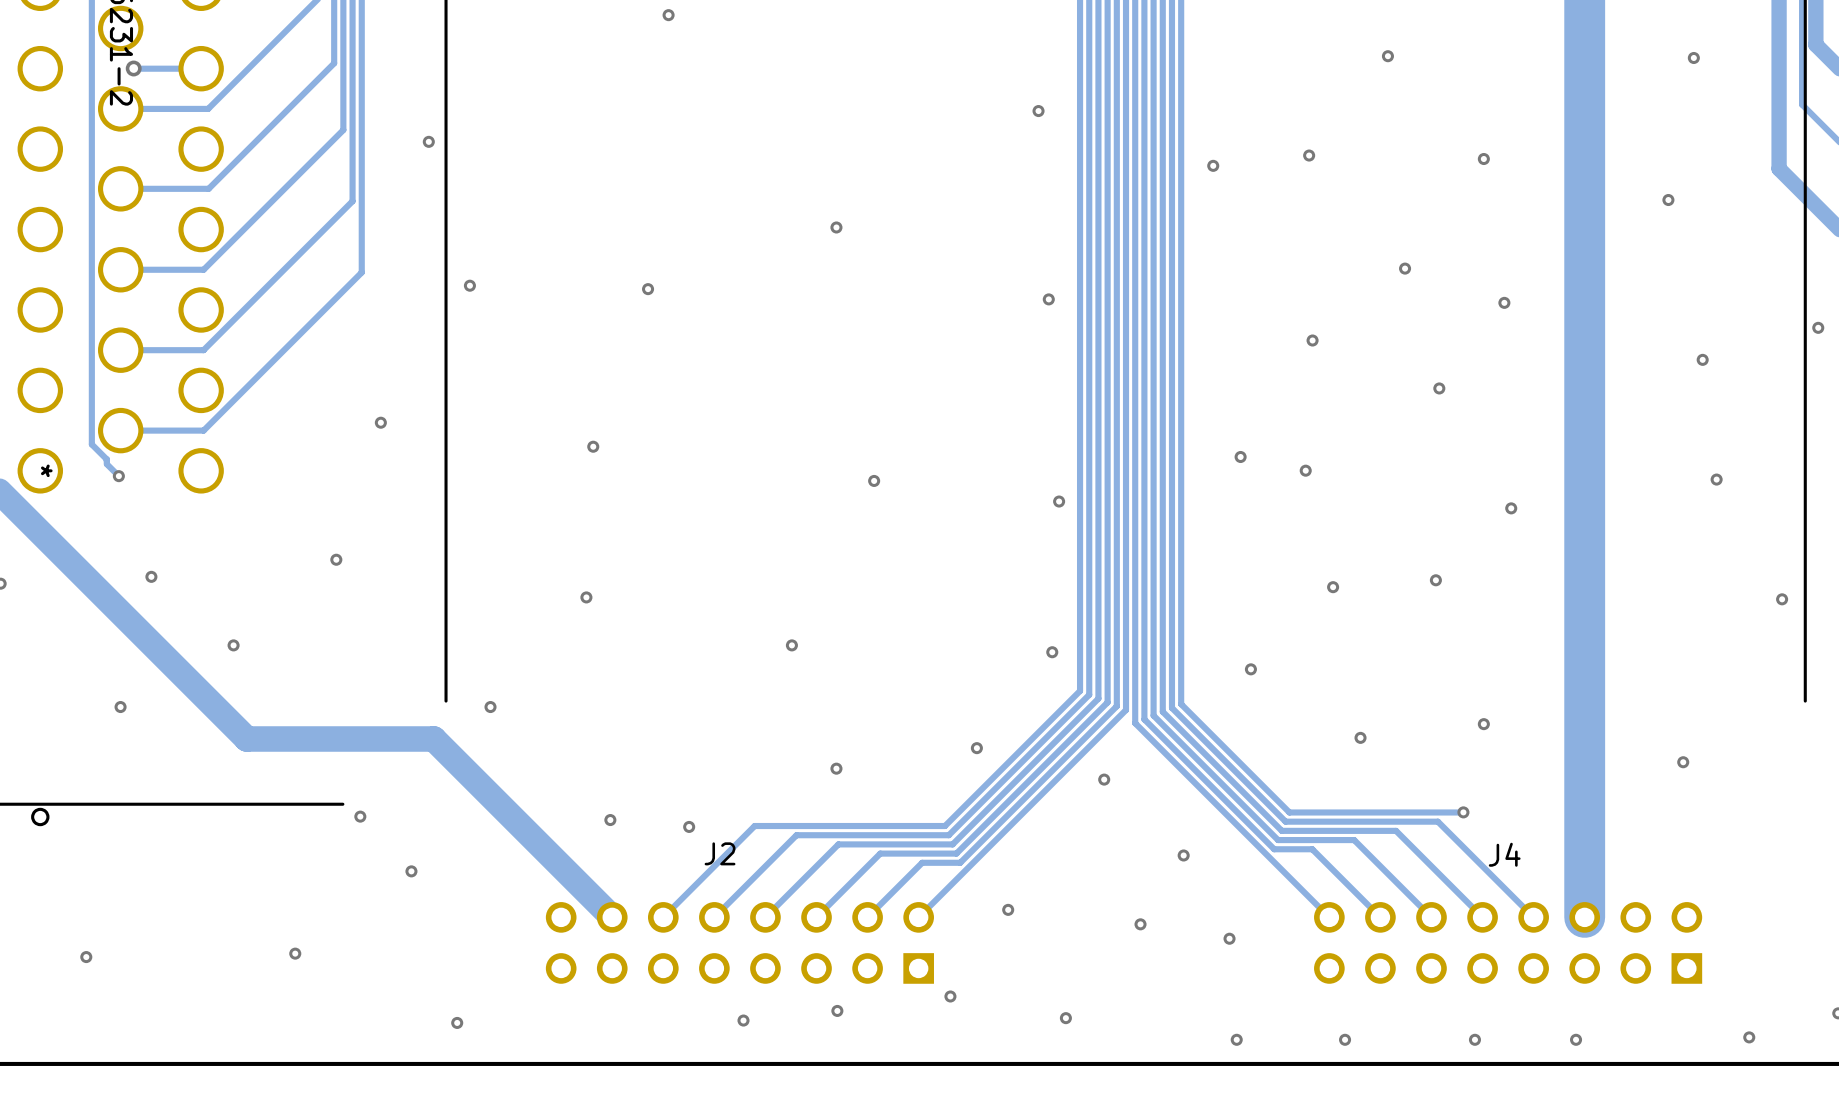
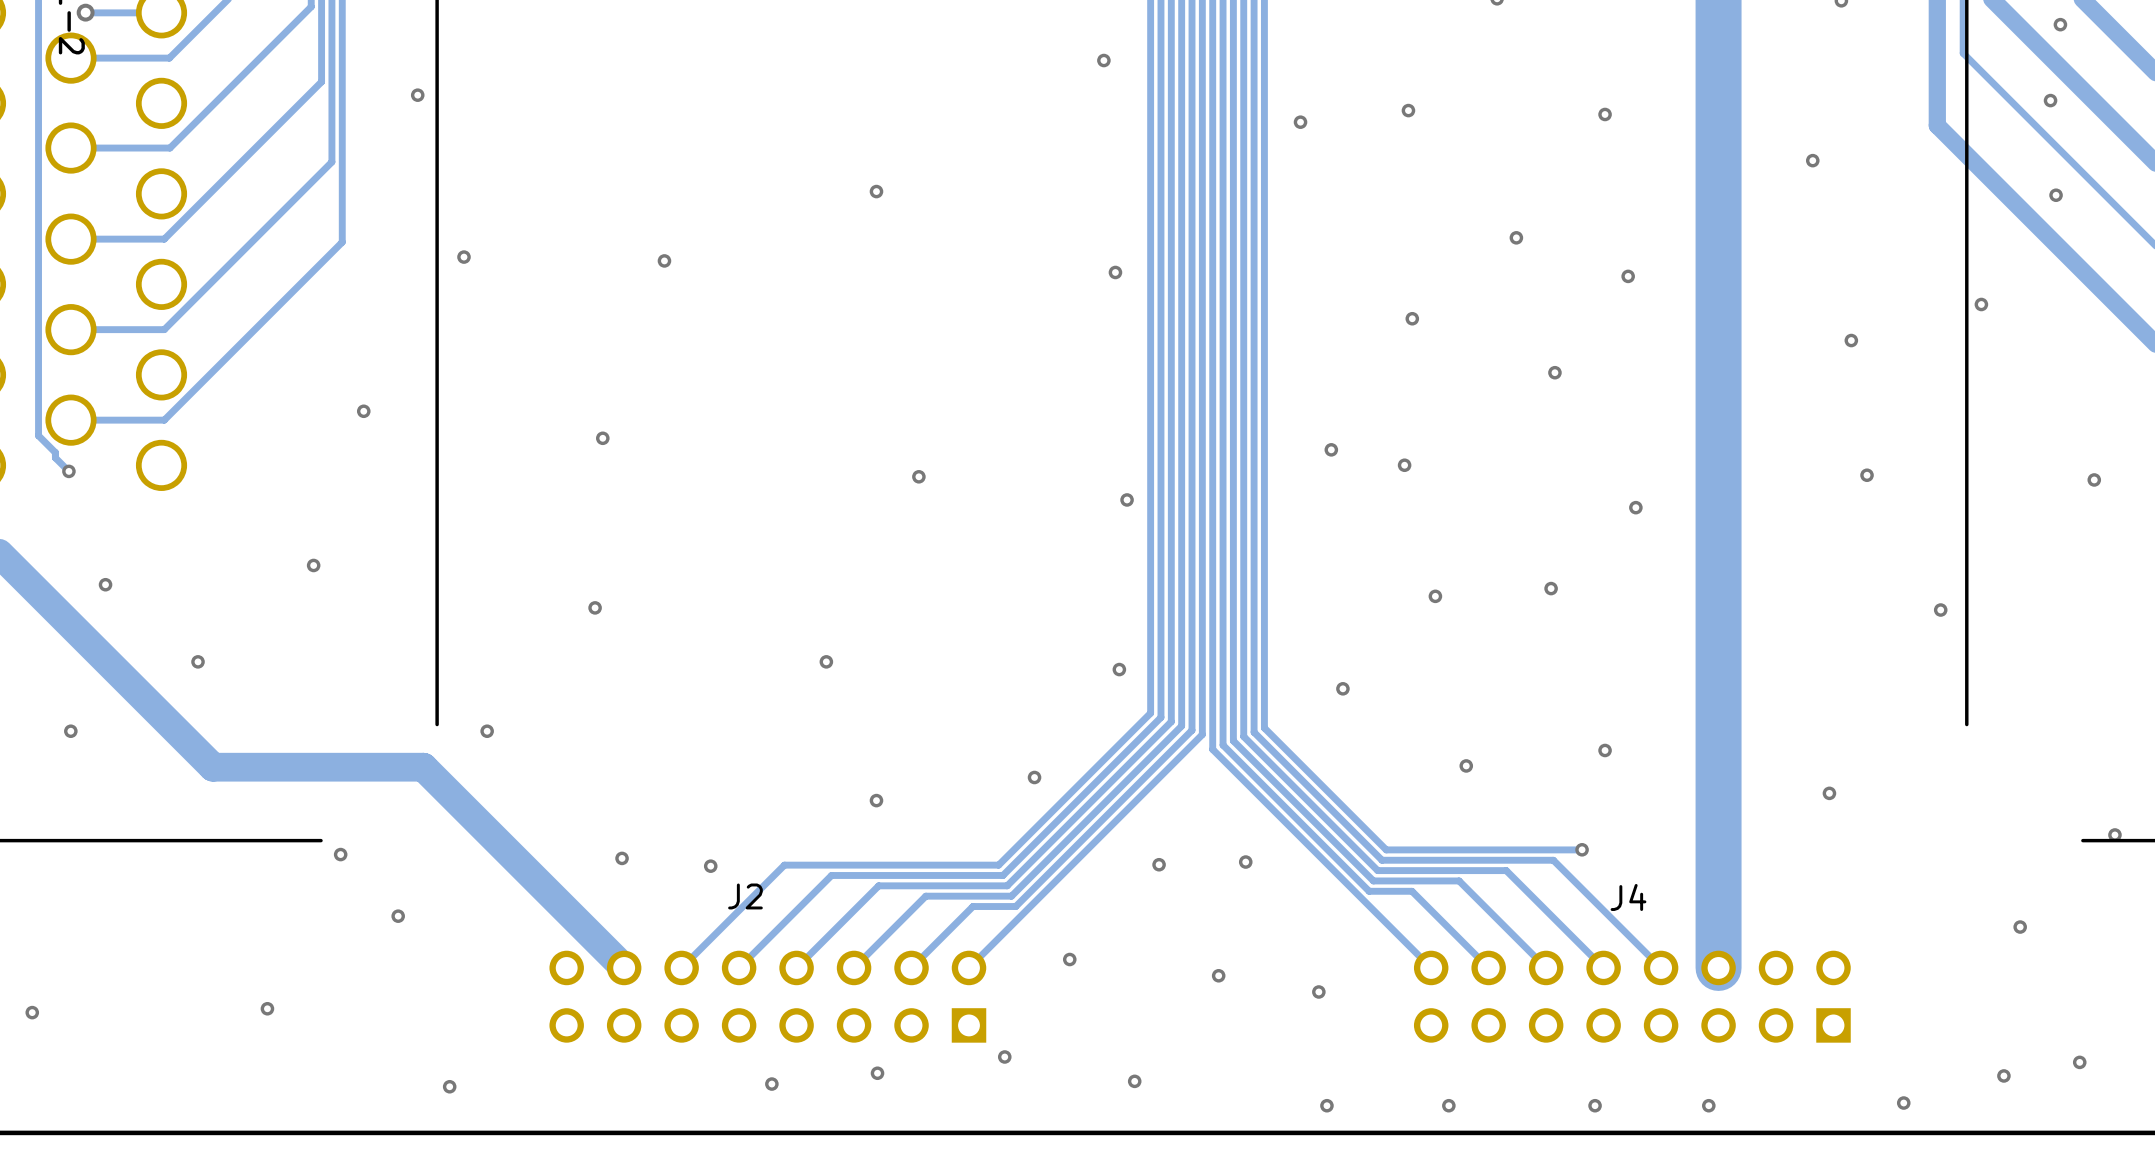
via: (1104, 779) -> none
via: none -> (1245, 862)
via: none -> (1159, 864)
via: (1183, 855) -> none

